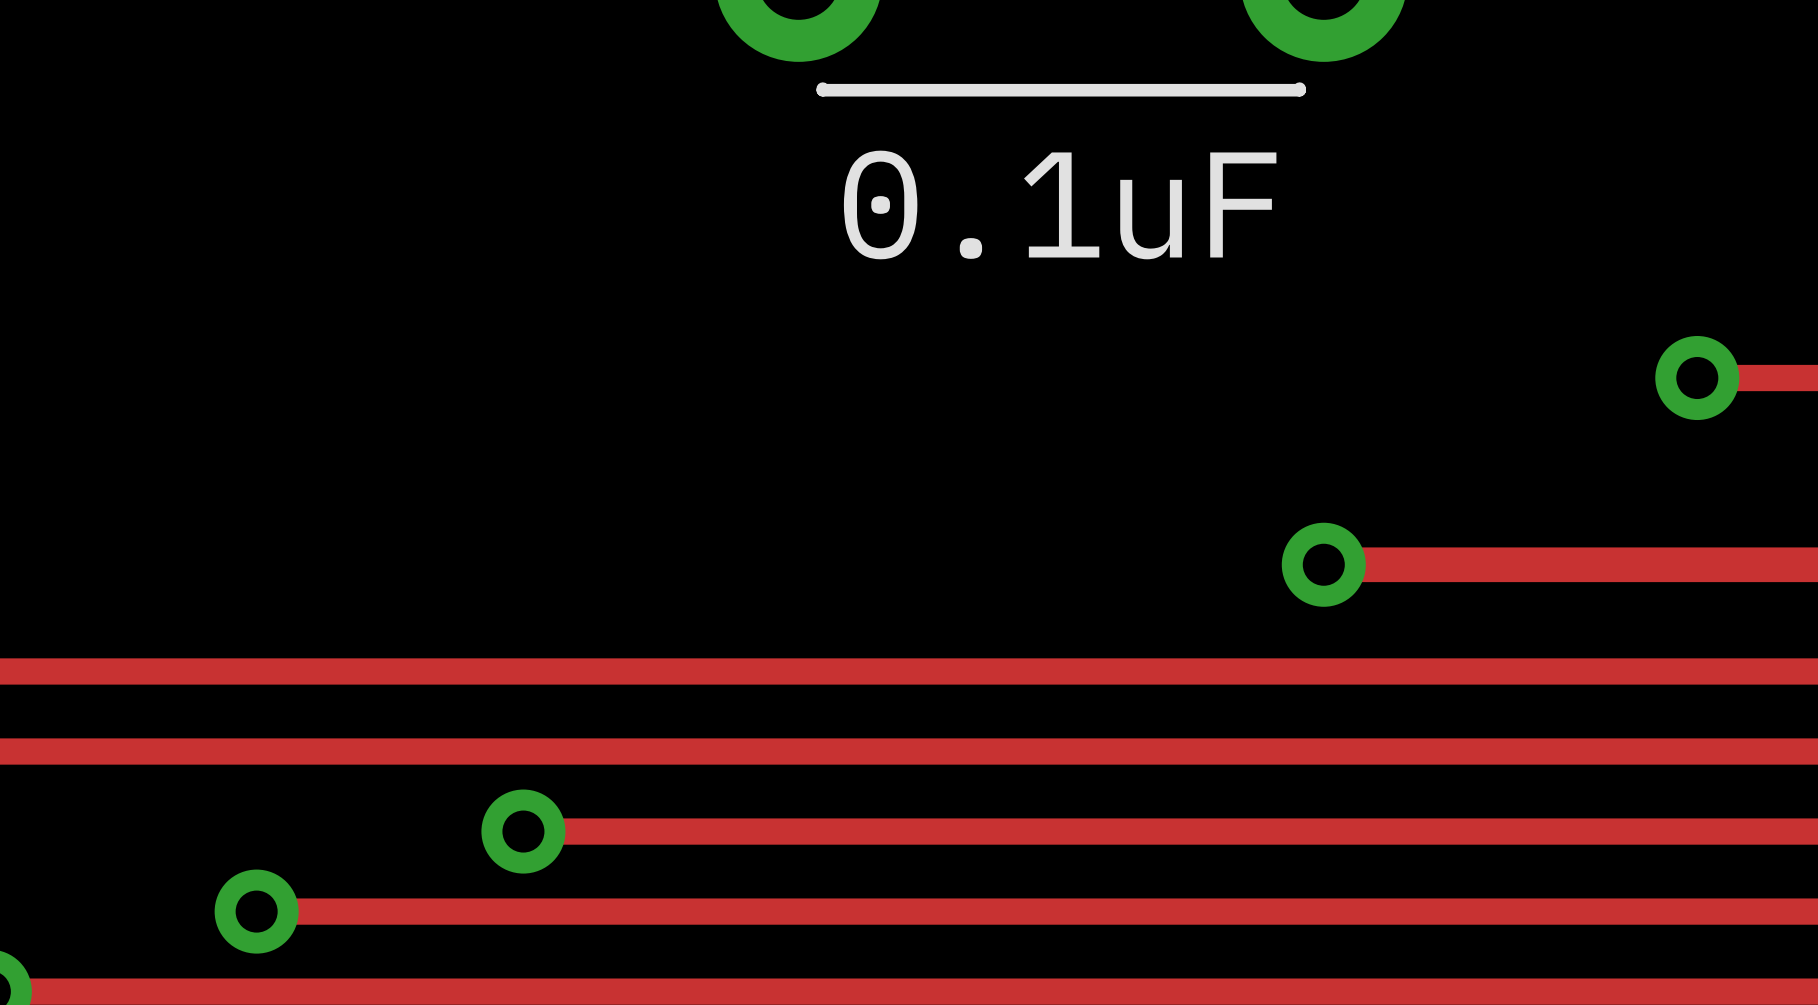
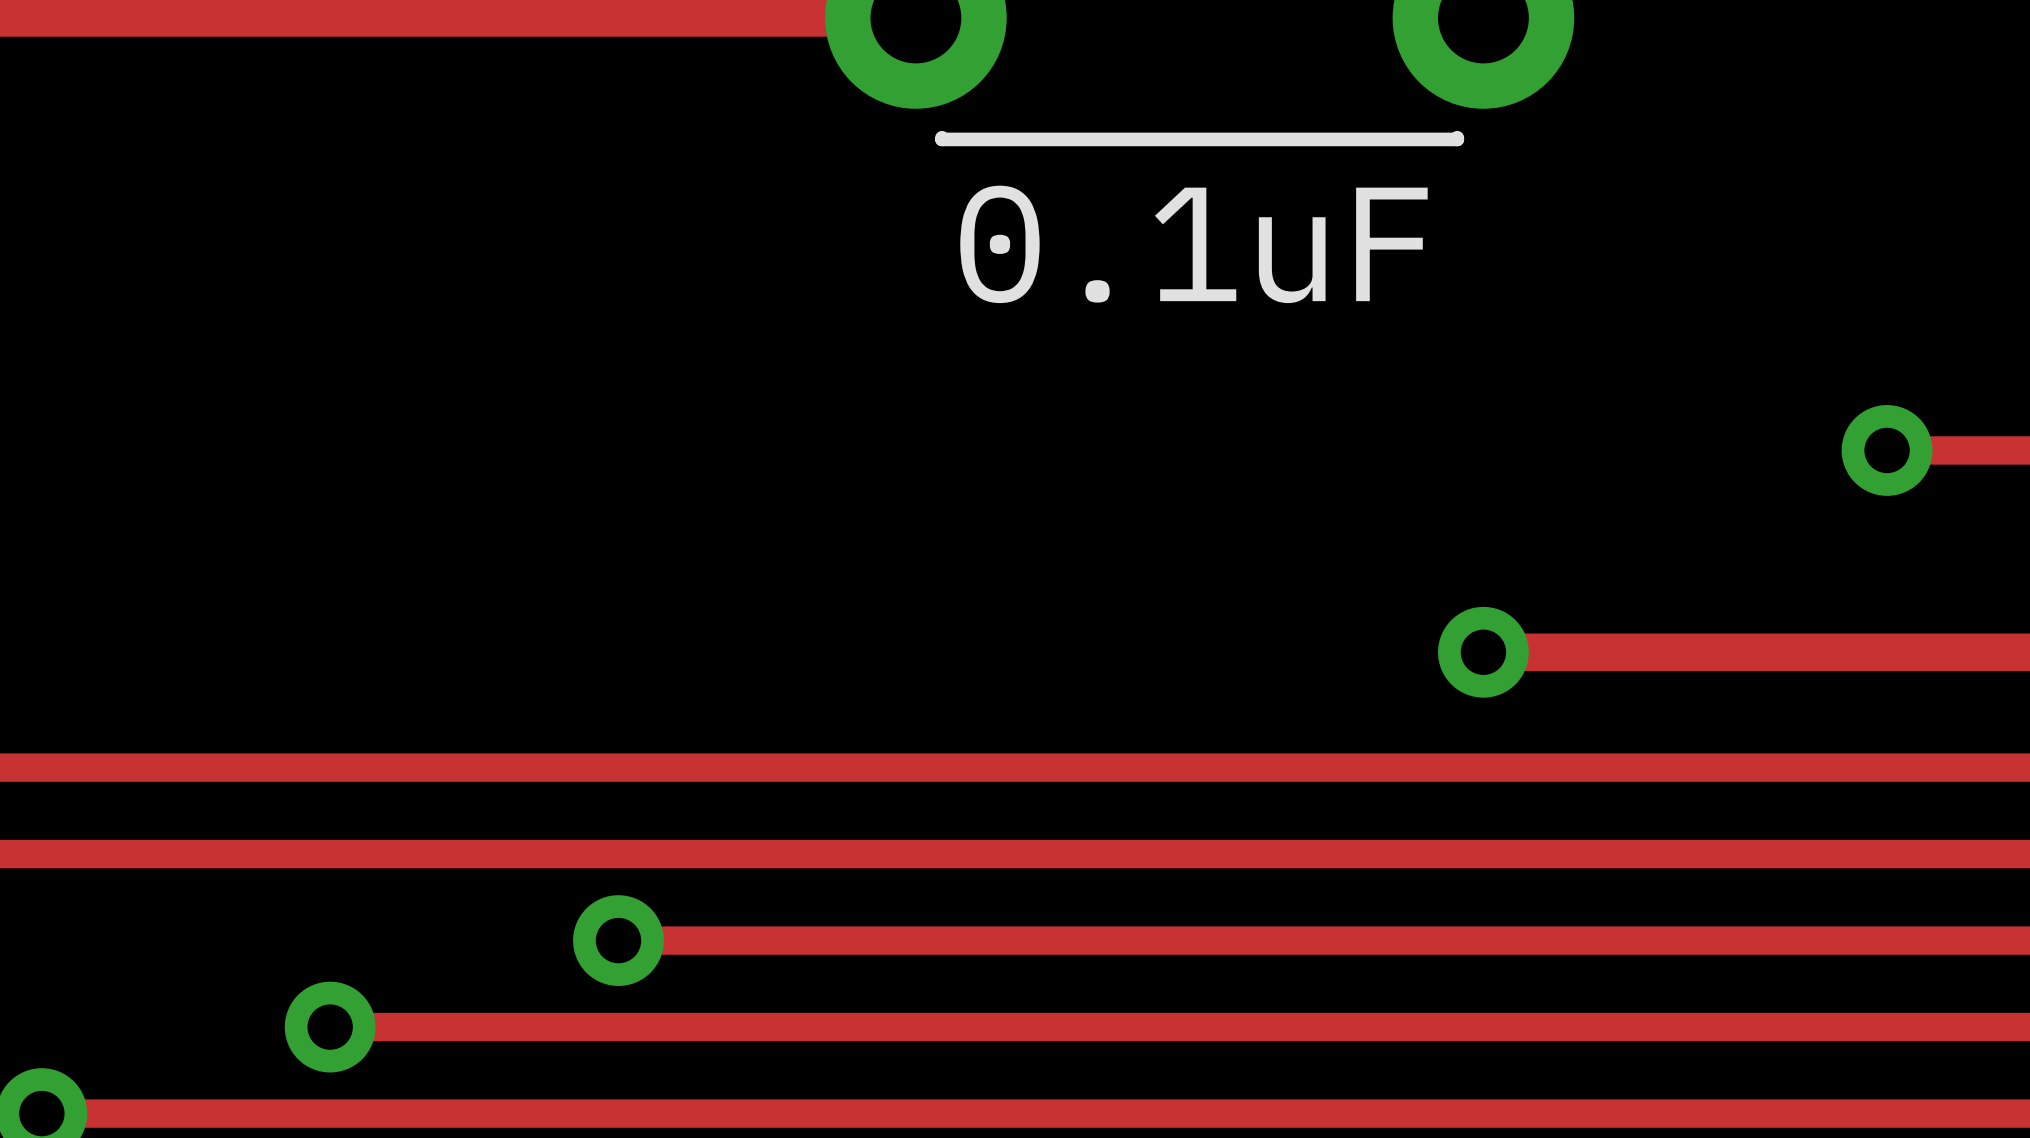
part value position: 0.1uF (1060, 204) -> 0.1uF (1193, 244)

